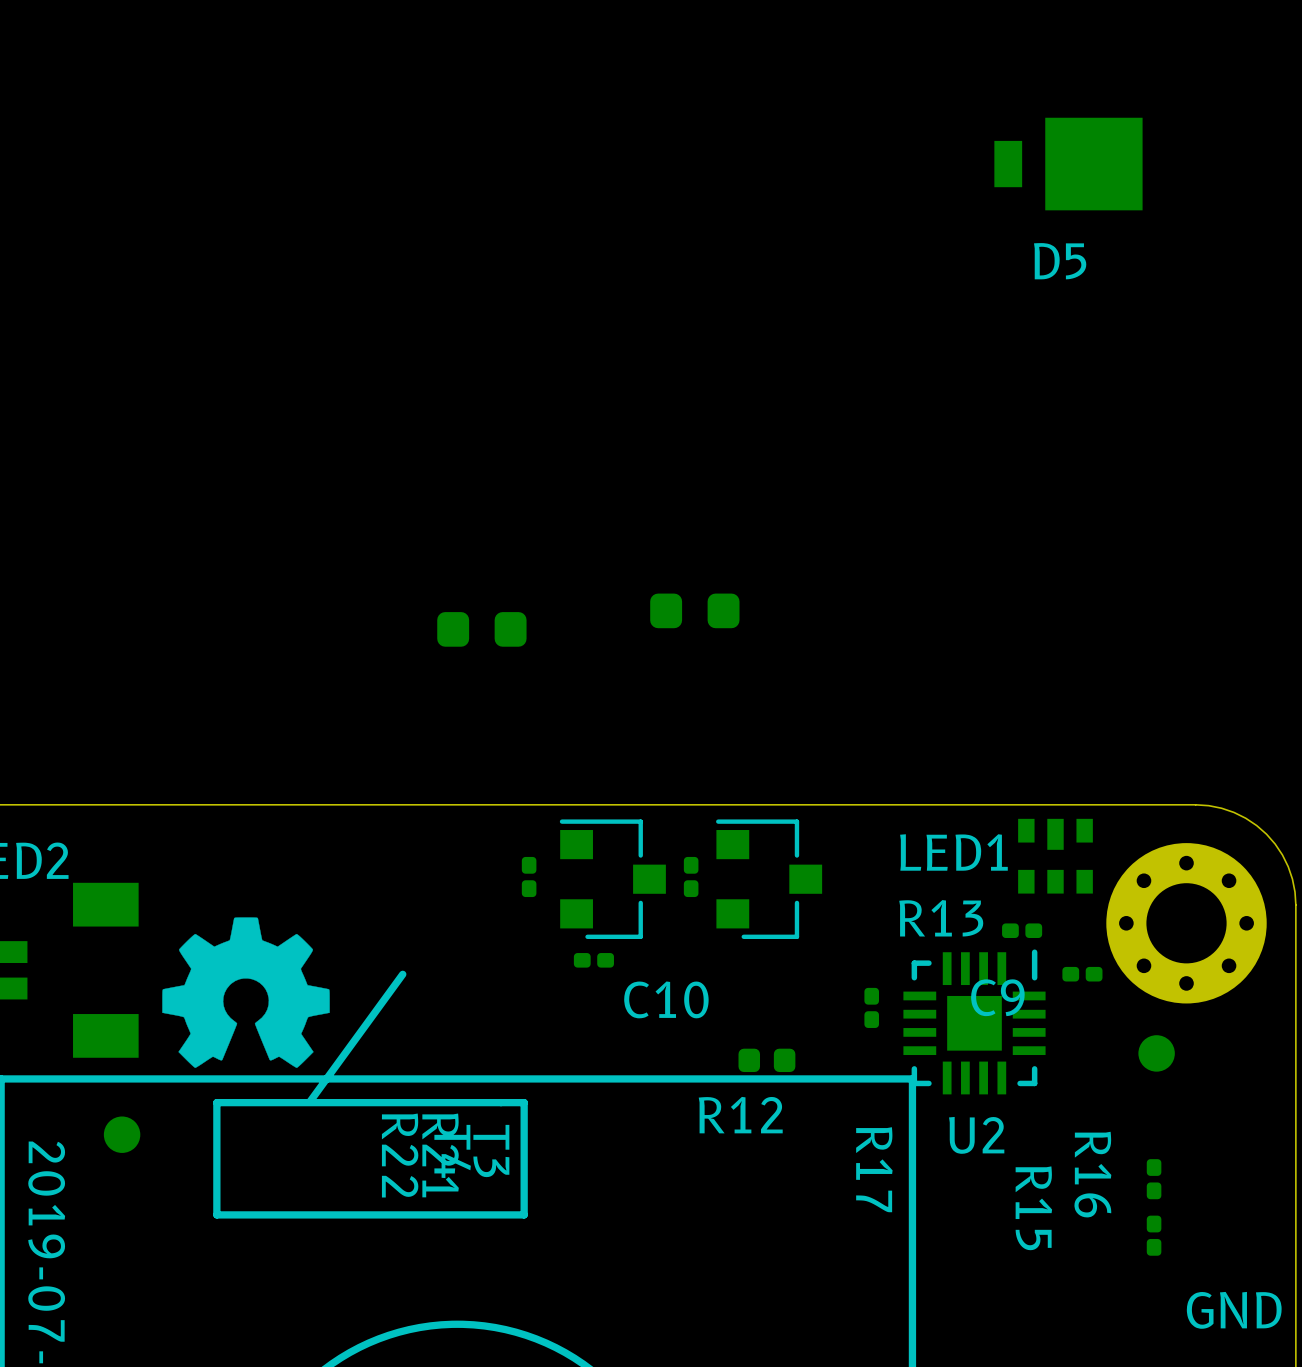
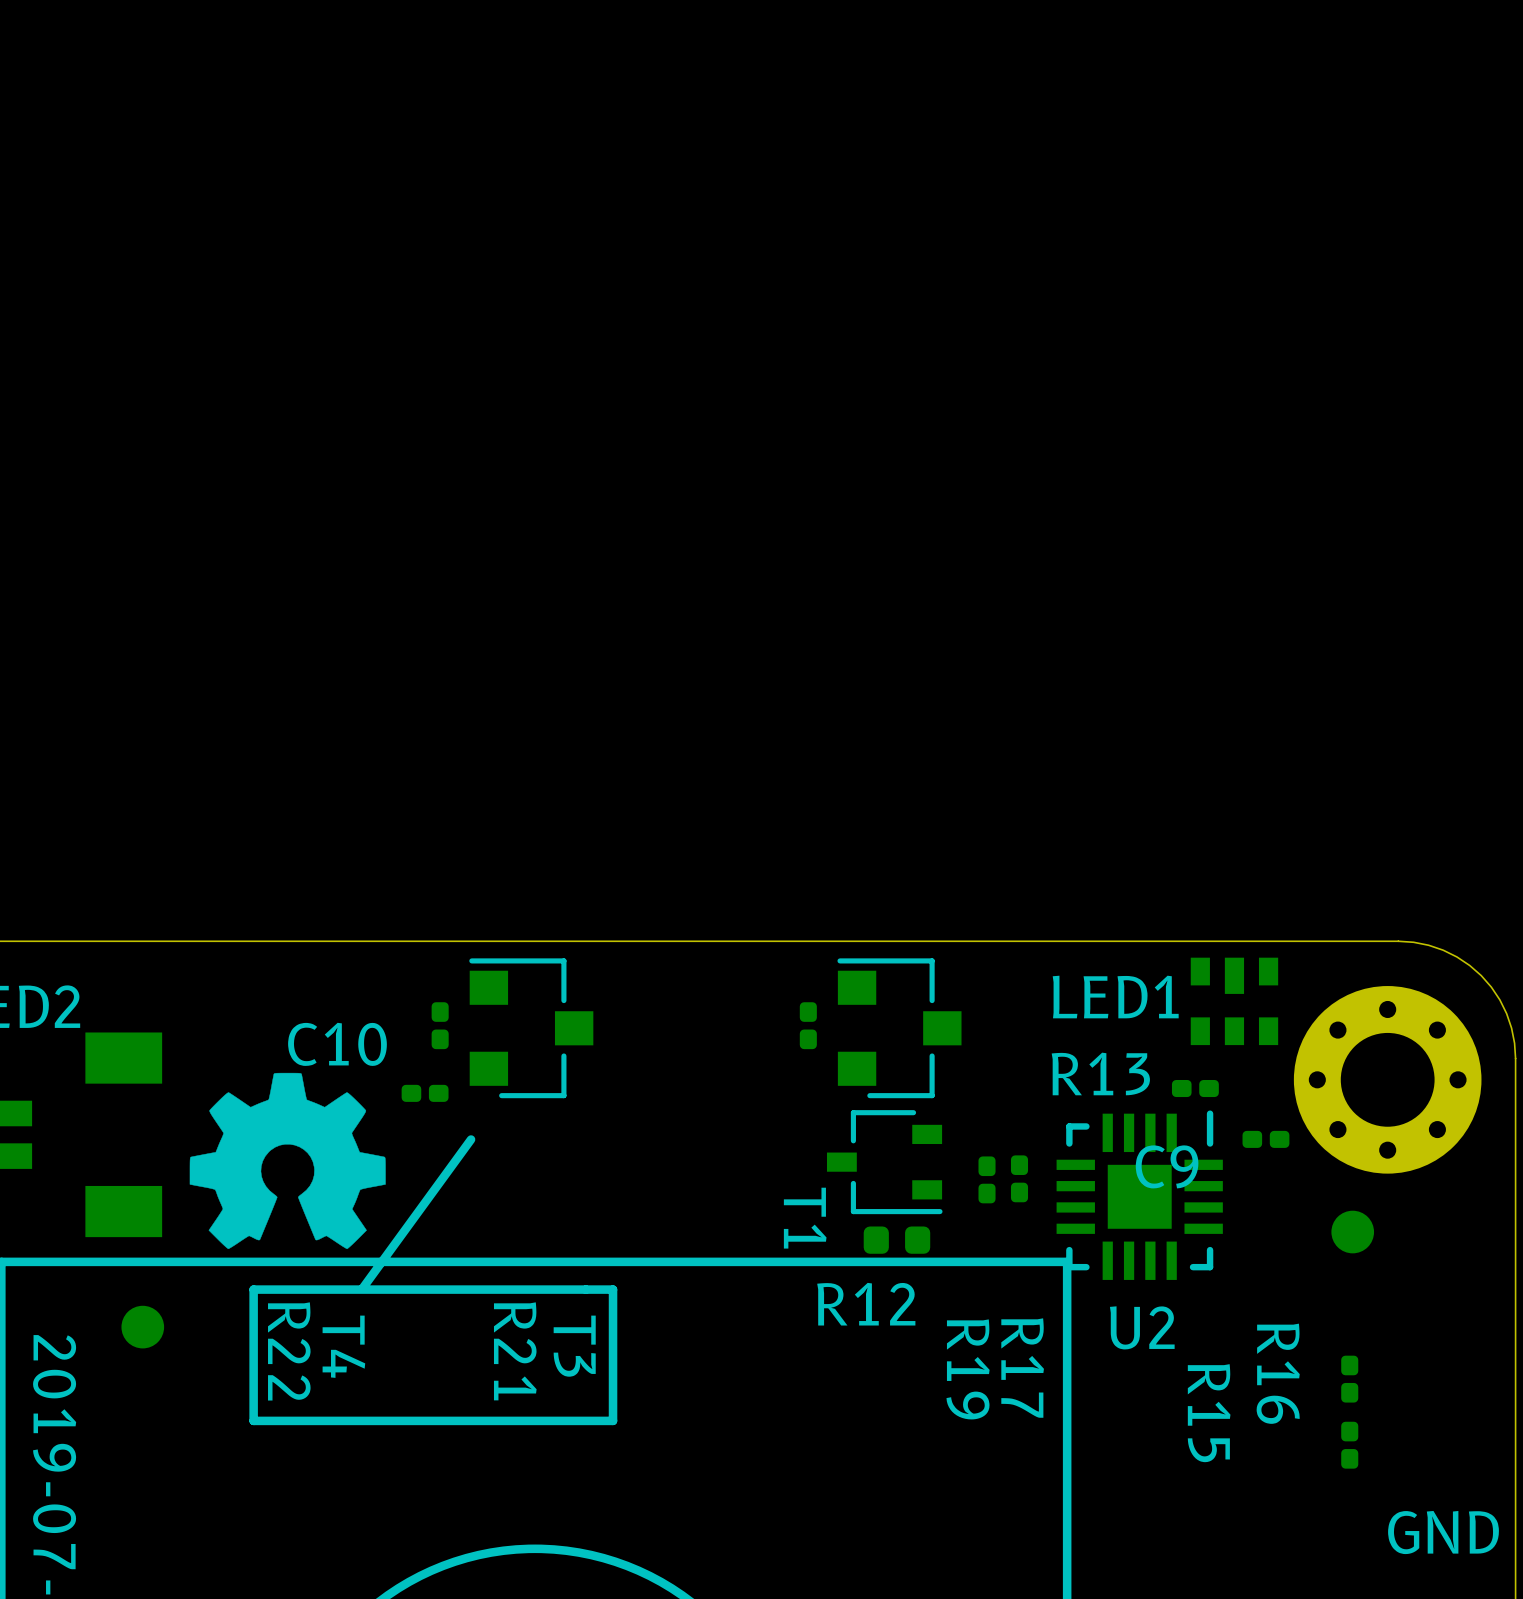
D5: (1068, 164) -> none
part: (694, 610) -> none
part: (481, 629) -> none
R22 position: (529, 876) -> (440, 1025)
T4 position: (612, 879) -> (531, 1028)
C10 position: (593, 960) -> (425, 1093)
T1: none -> (884, 1162)
C10 name position: C10 (666, 999) -> C10 (337, 1044)
R19: none -> (987, 1179)

